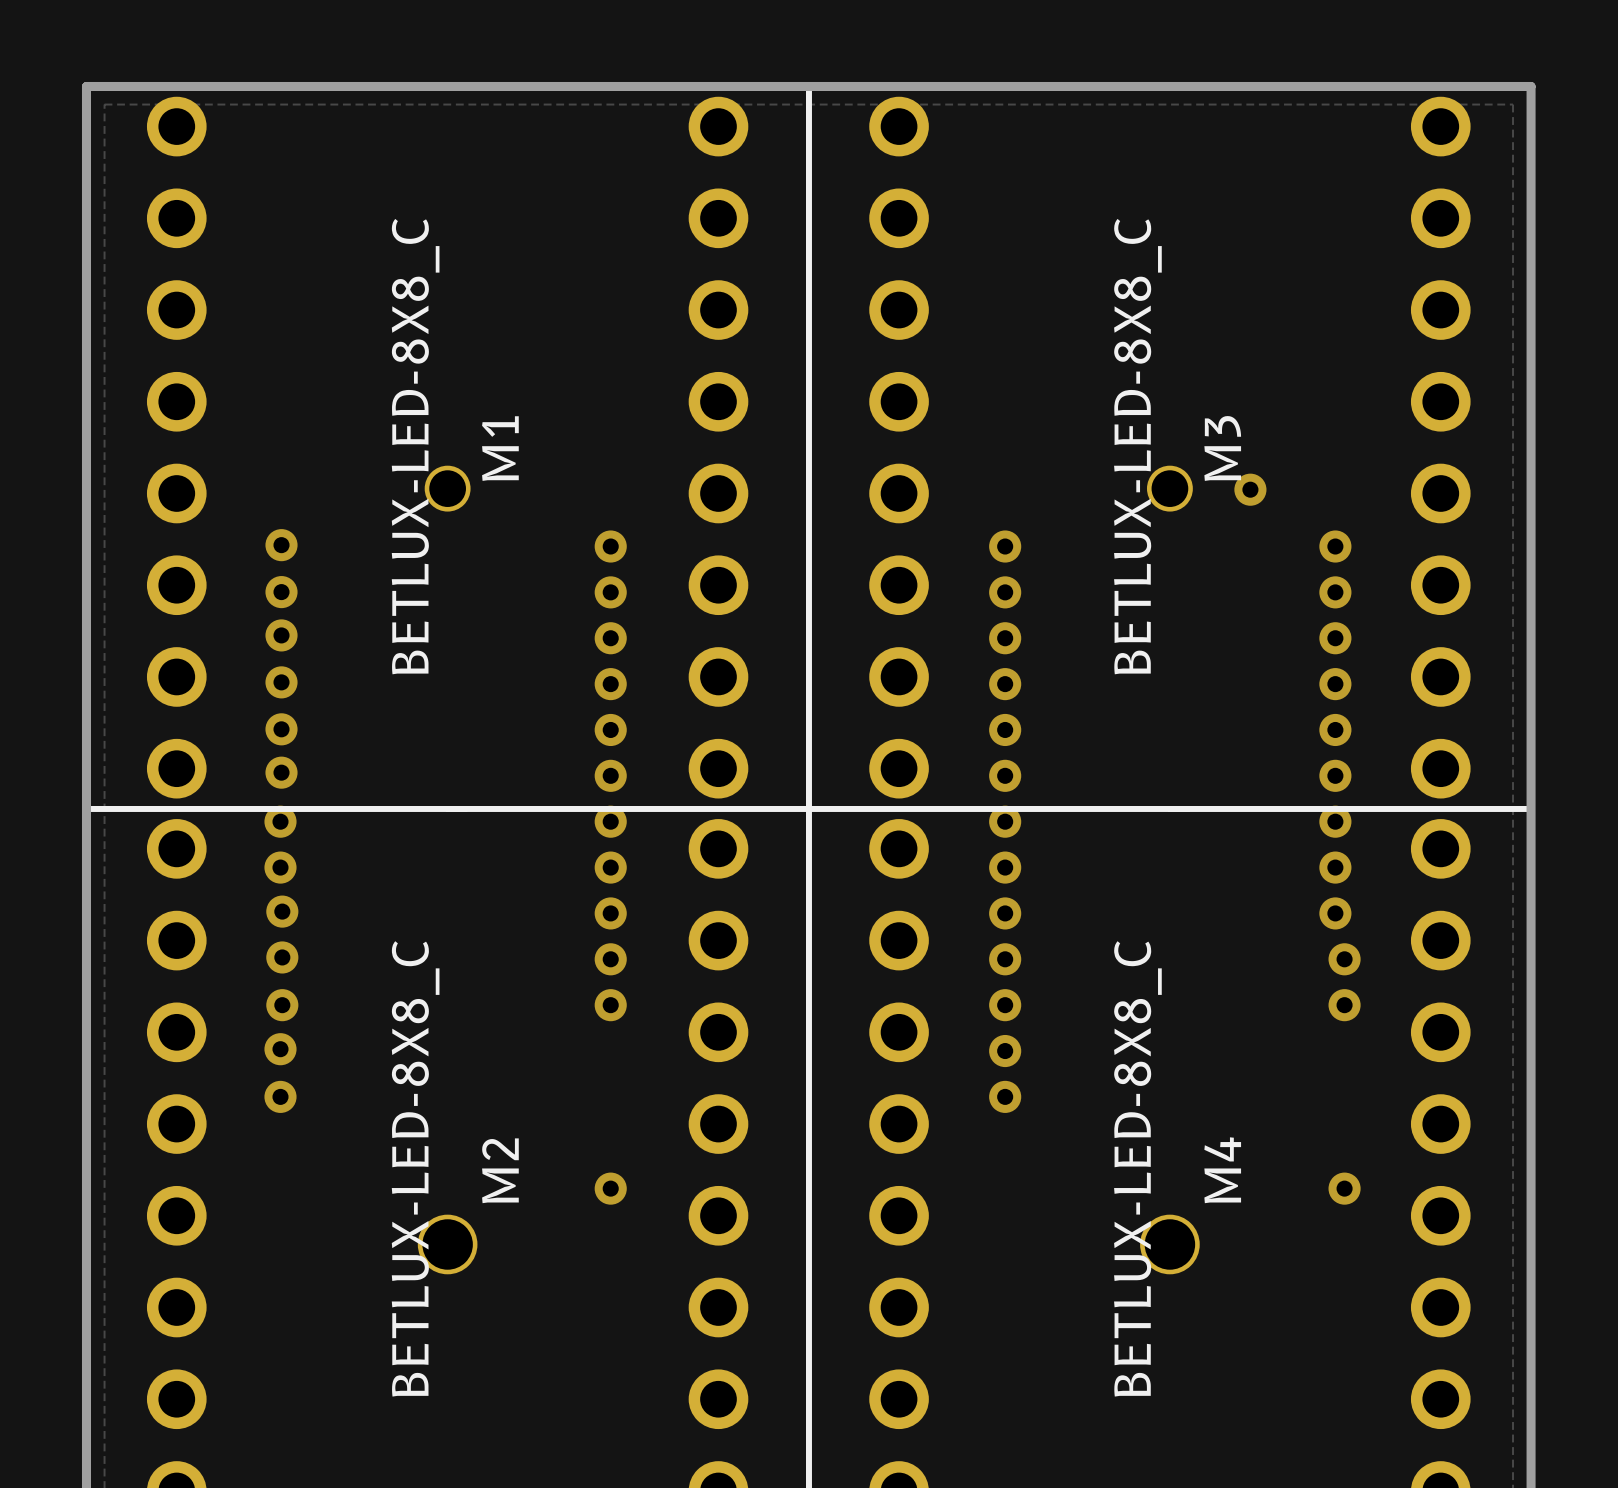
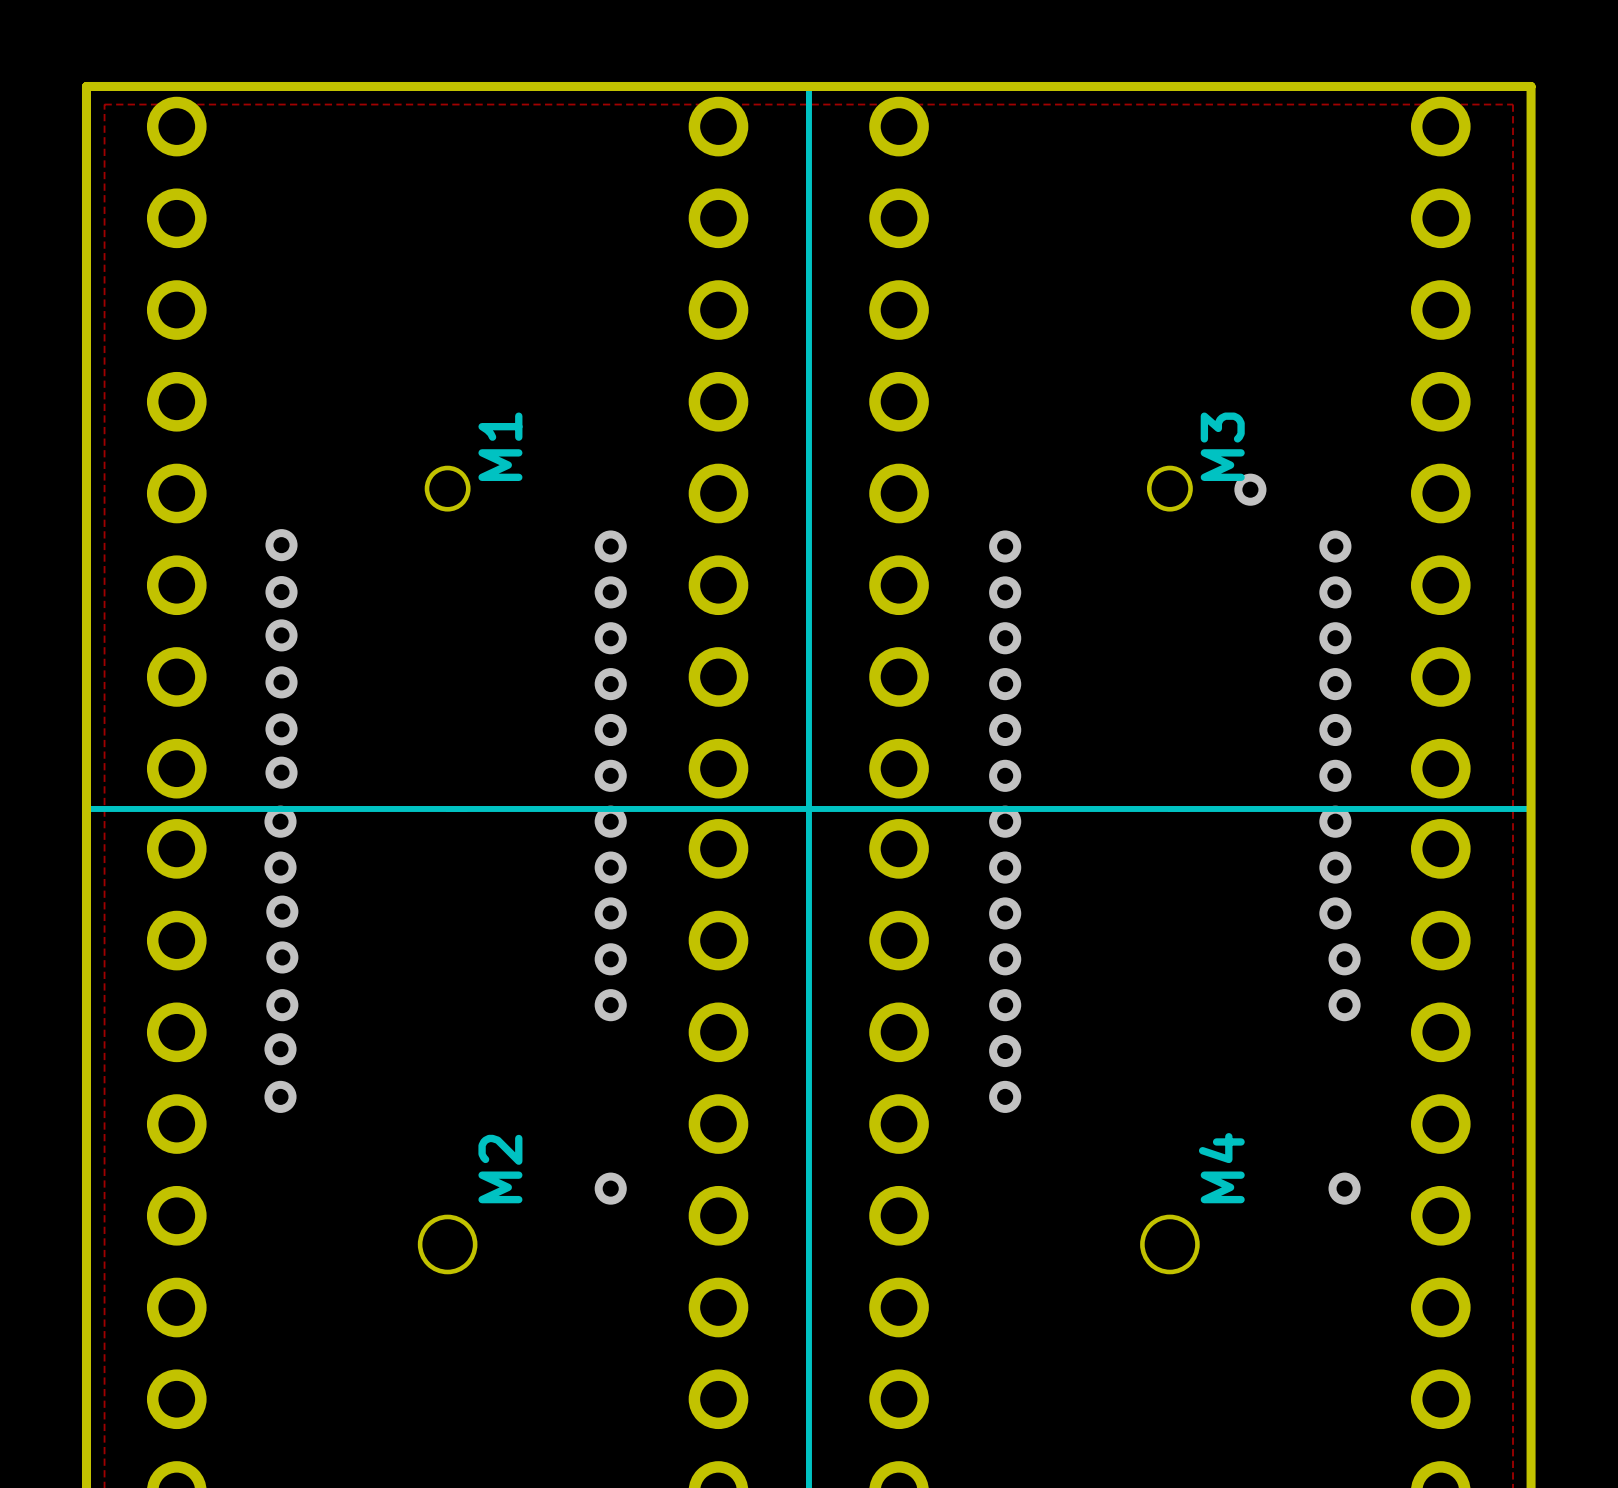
M1 value: BETLUX-LED-8X8_C (415, 446) -> none
M3 value: BETLUX-LED-8X8_C (1137, 446) -> none
M2 value: BETLUX-LED-8X8_C (415, 1168) -> none
M4 value: BETLUX-LED-8X8_C (1137, 1168) -> none

